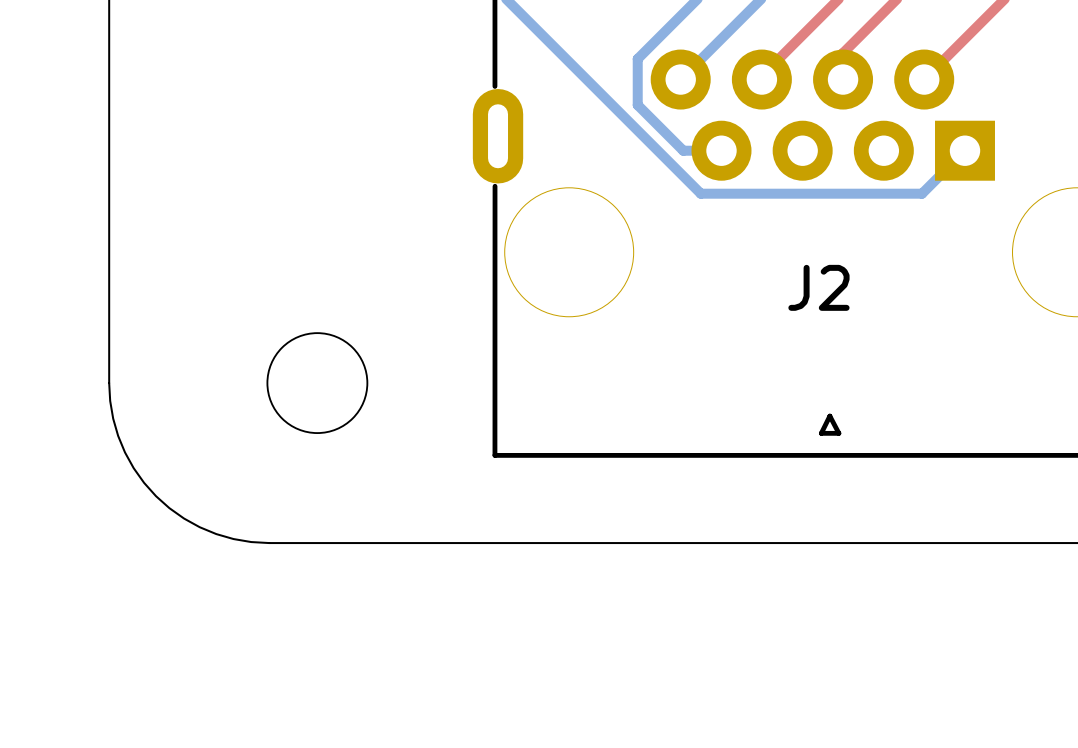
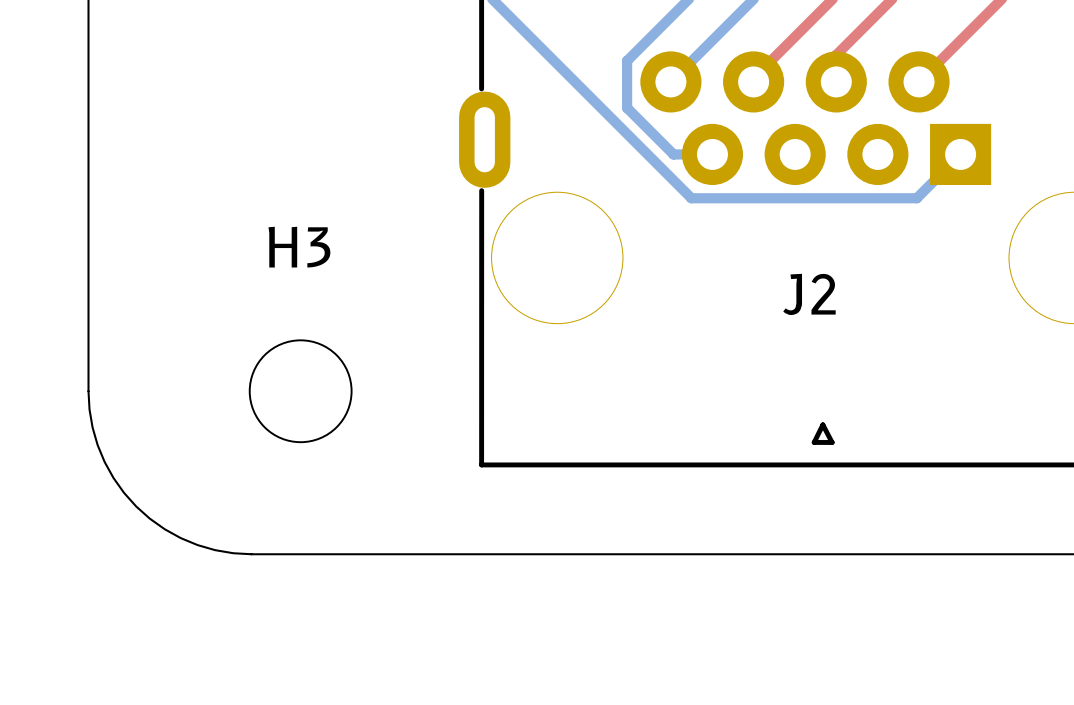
H3 name: none -> H3 (299, 247)

